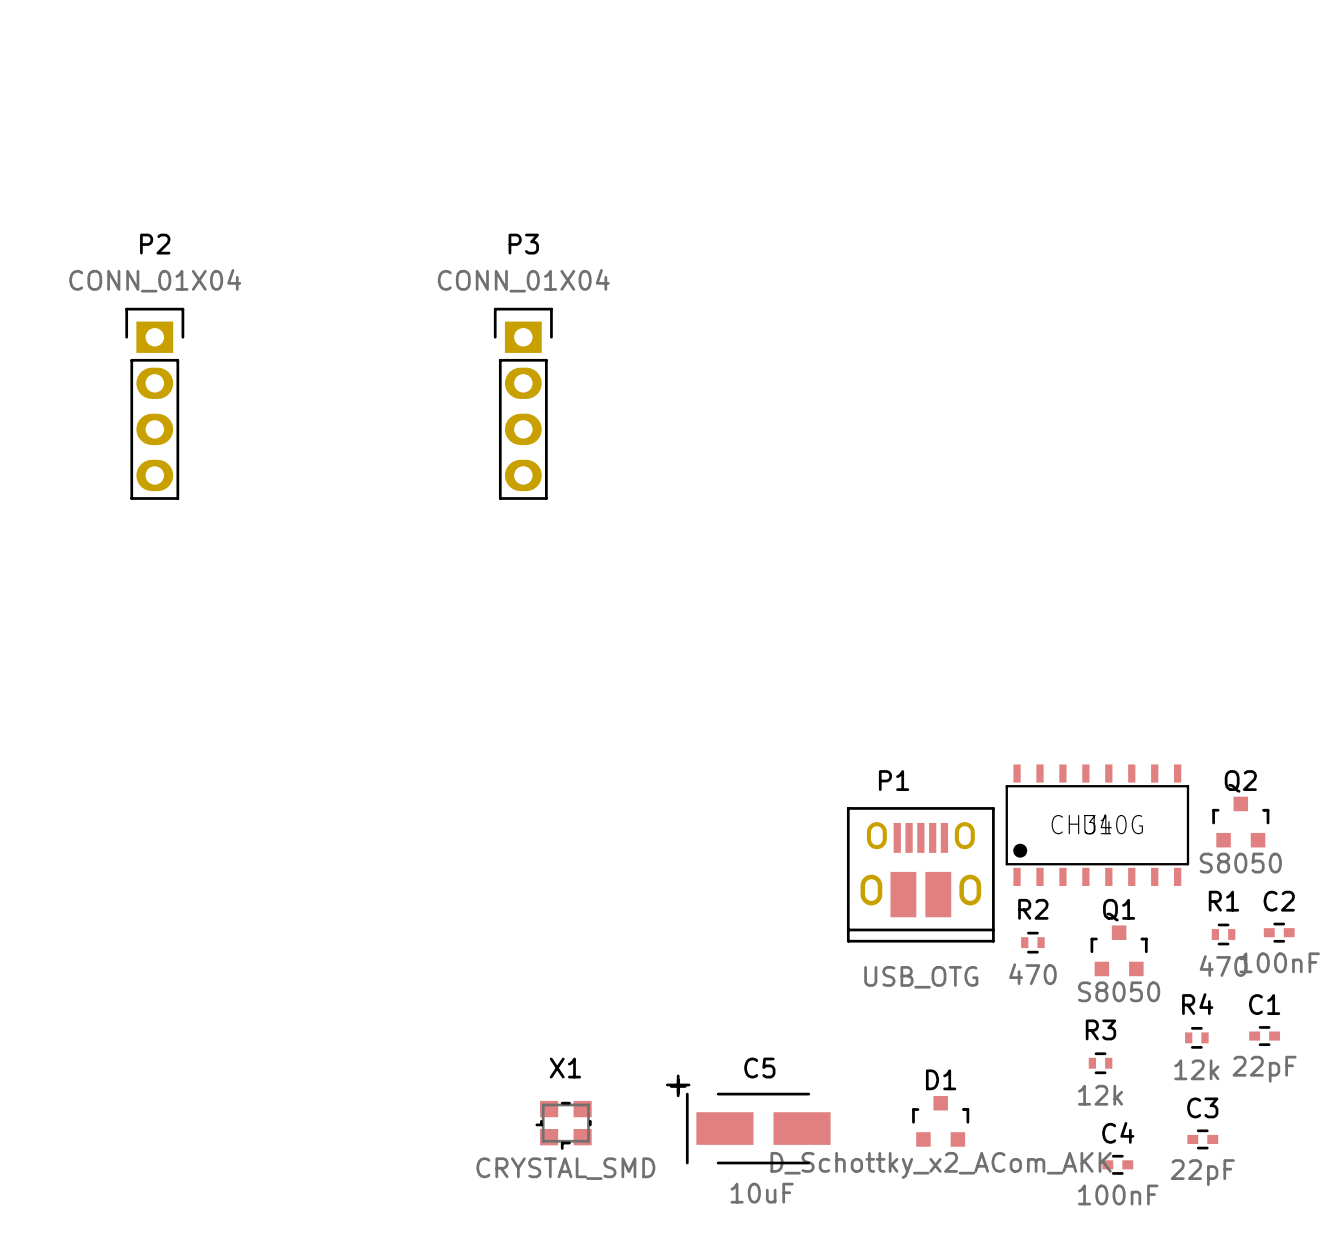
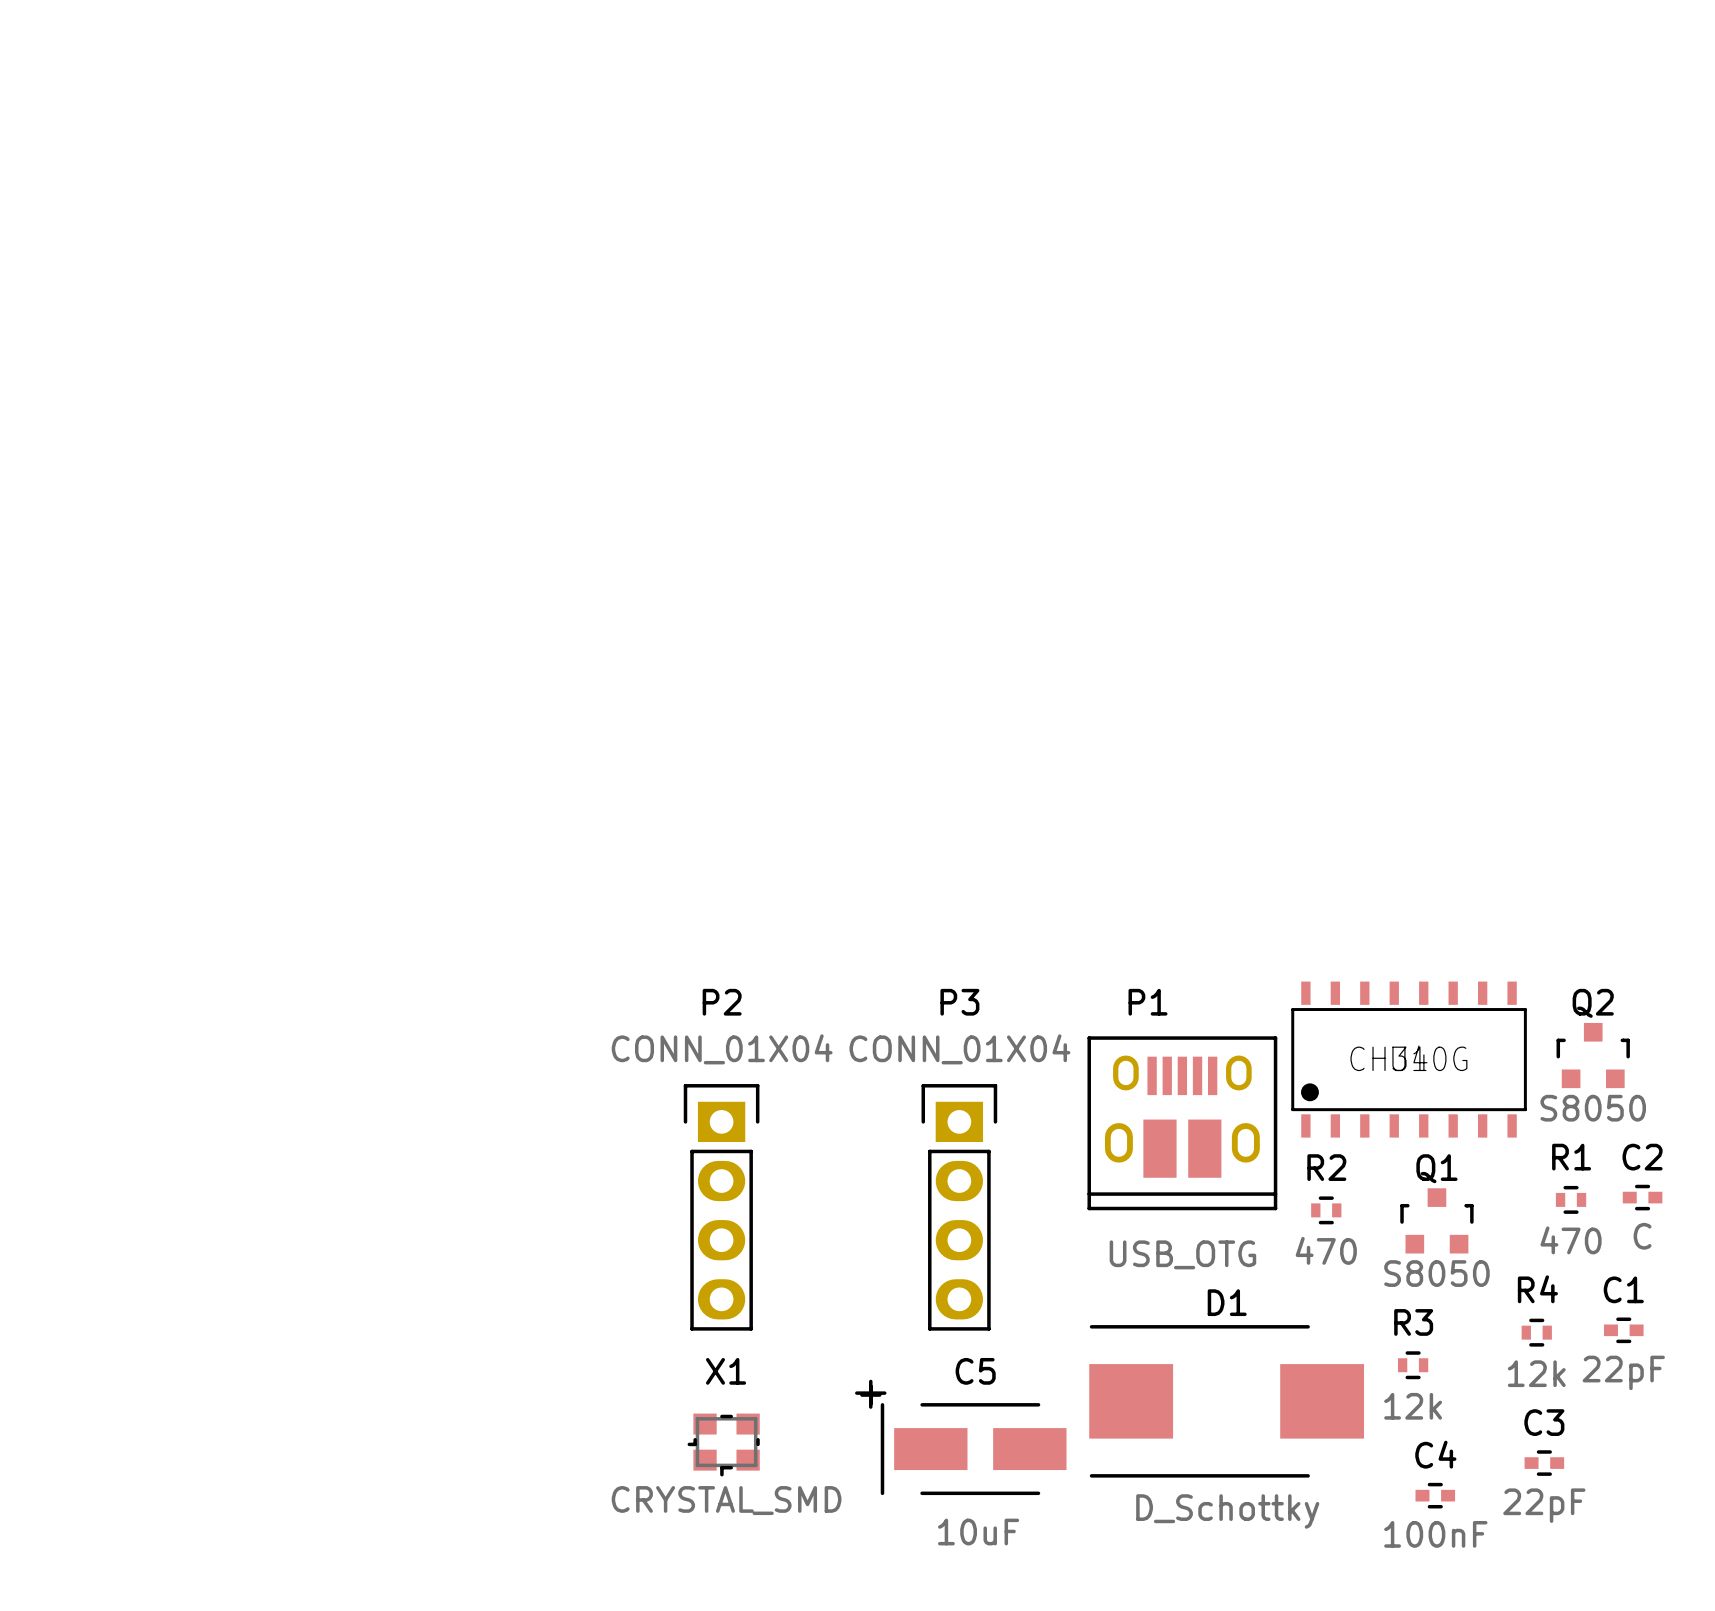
P2 position: (154, 403) -> (721, 1207)
P3 position: (523, 403) -> (959, 1207)
C2 value: 100nF (1279, 962) -> C (1642, 1236)
D1 footprint: [912, 1095, 970, 1147] -> [1089, 1325, 1365, 1478]
D1 value: D_Schottky_x2_ACom_AKK (941, 1165) -> D_Schottky (1227, 1511)

